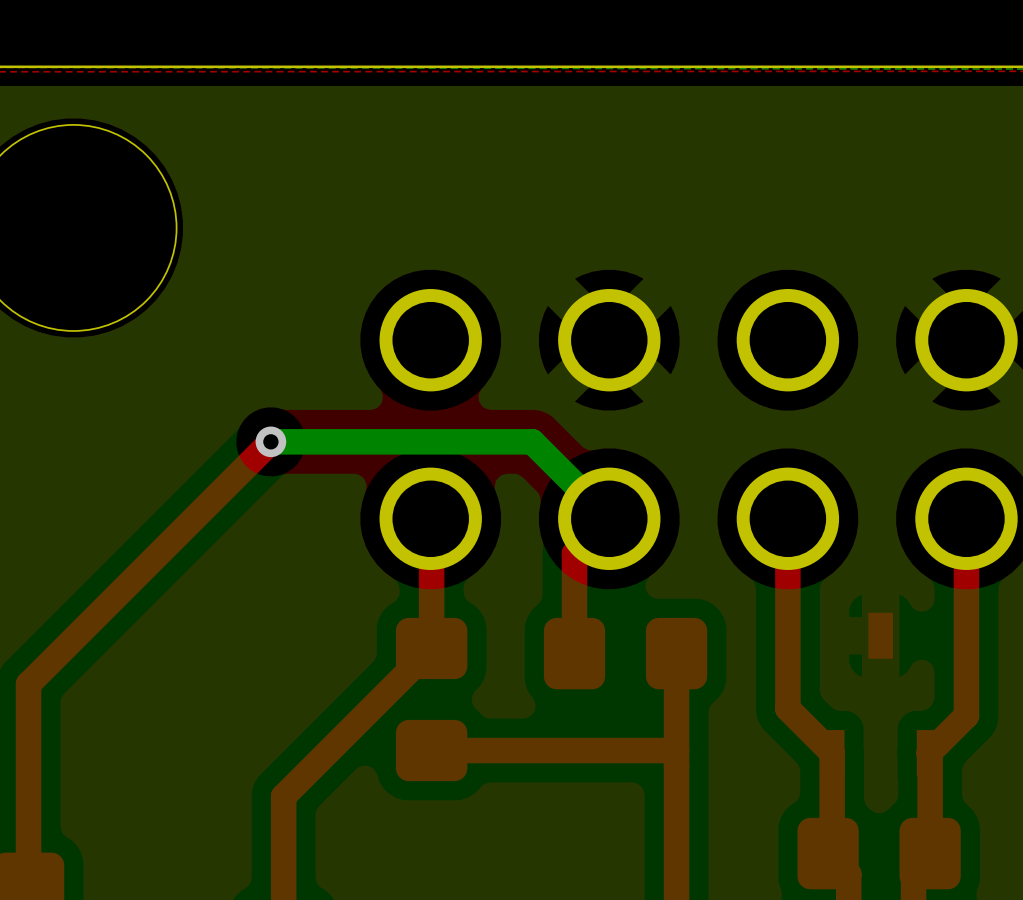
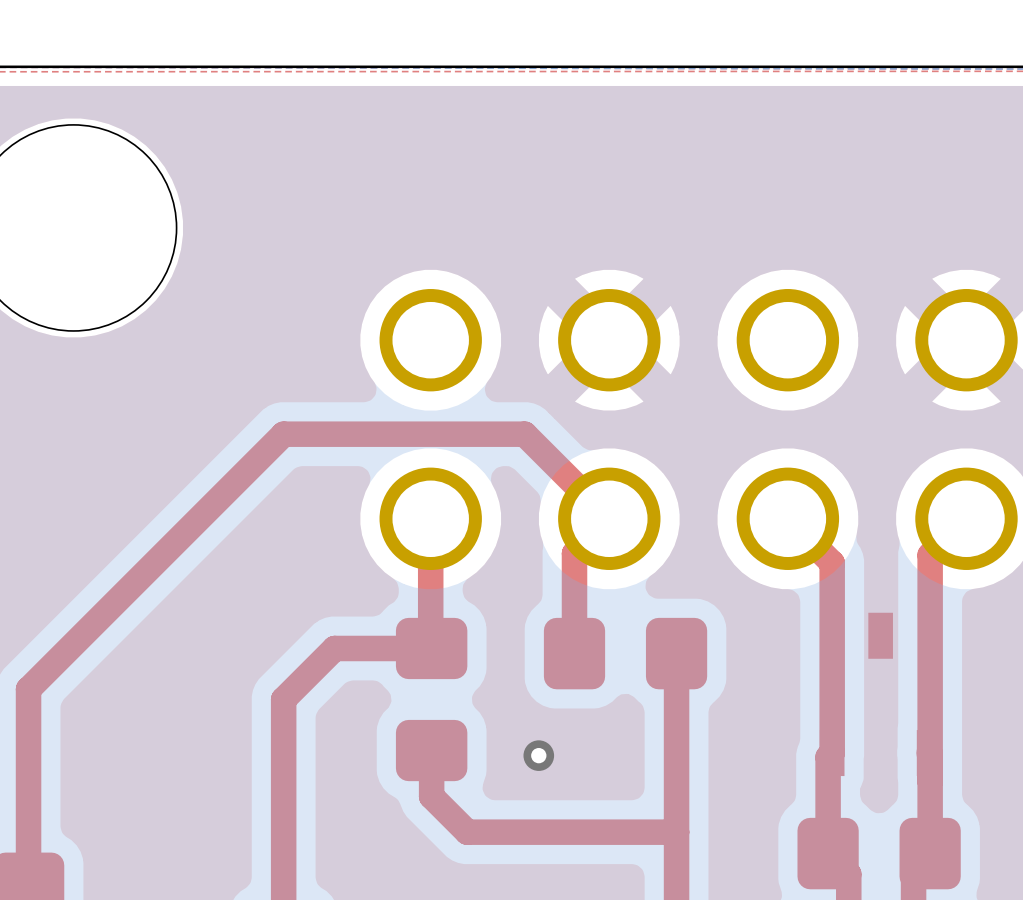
top track: (270, 441) (28, 684) (28, 689) -> (609, 518) (524, 434) (283, 434) (28, 689)
bottom track: (270, 441) (532, 441) (609, 518) -> none
via: (270, 441) -> none
top track: (430, 518) (431, 648) (283, 796) -> (430, 518) (431, 648) (334, 648) (283, 699) (283, 796)
top track: (787, 518) (787, 708) (832, 753) (832, 849) (828, 853) -> (787, 518) (832, 563) (832, 753) (828, 757) (828, 853)
top track: (966, 518) (966, 715) (929, 753) -> (966, 518) (930, 555) (930, 754)
top track: (676, 750) (431, 750) -> (676, 832) (467, 832) (431, 796) (431, 750)
via: none -> (538, 755)

